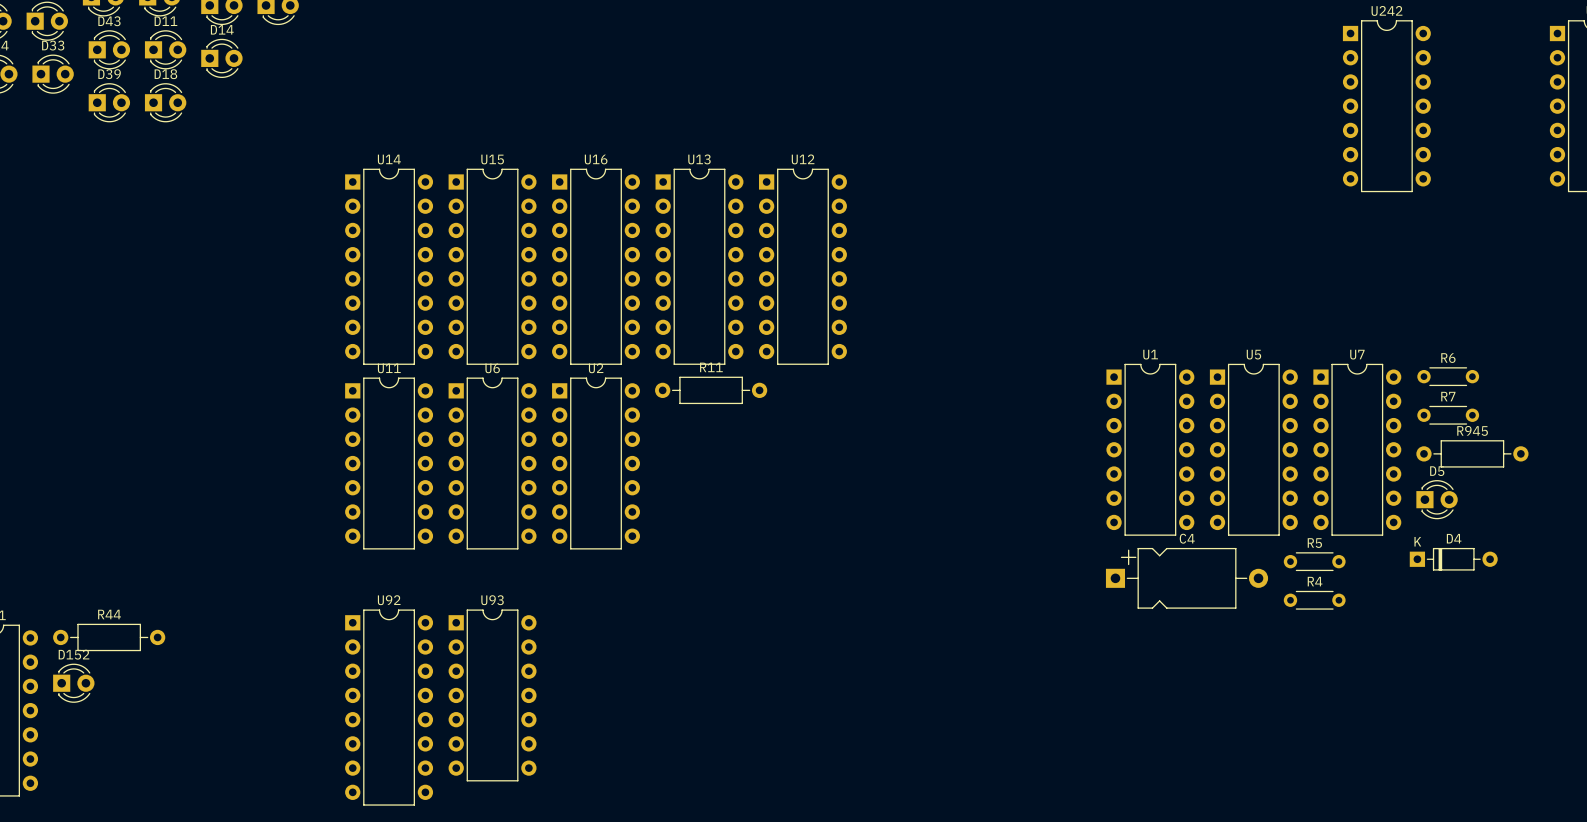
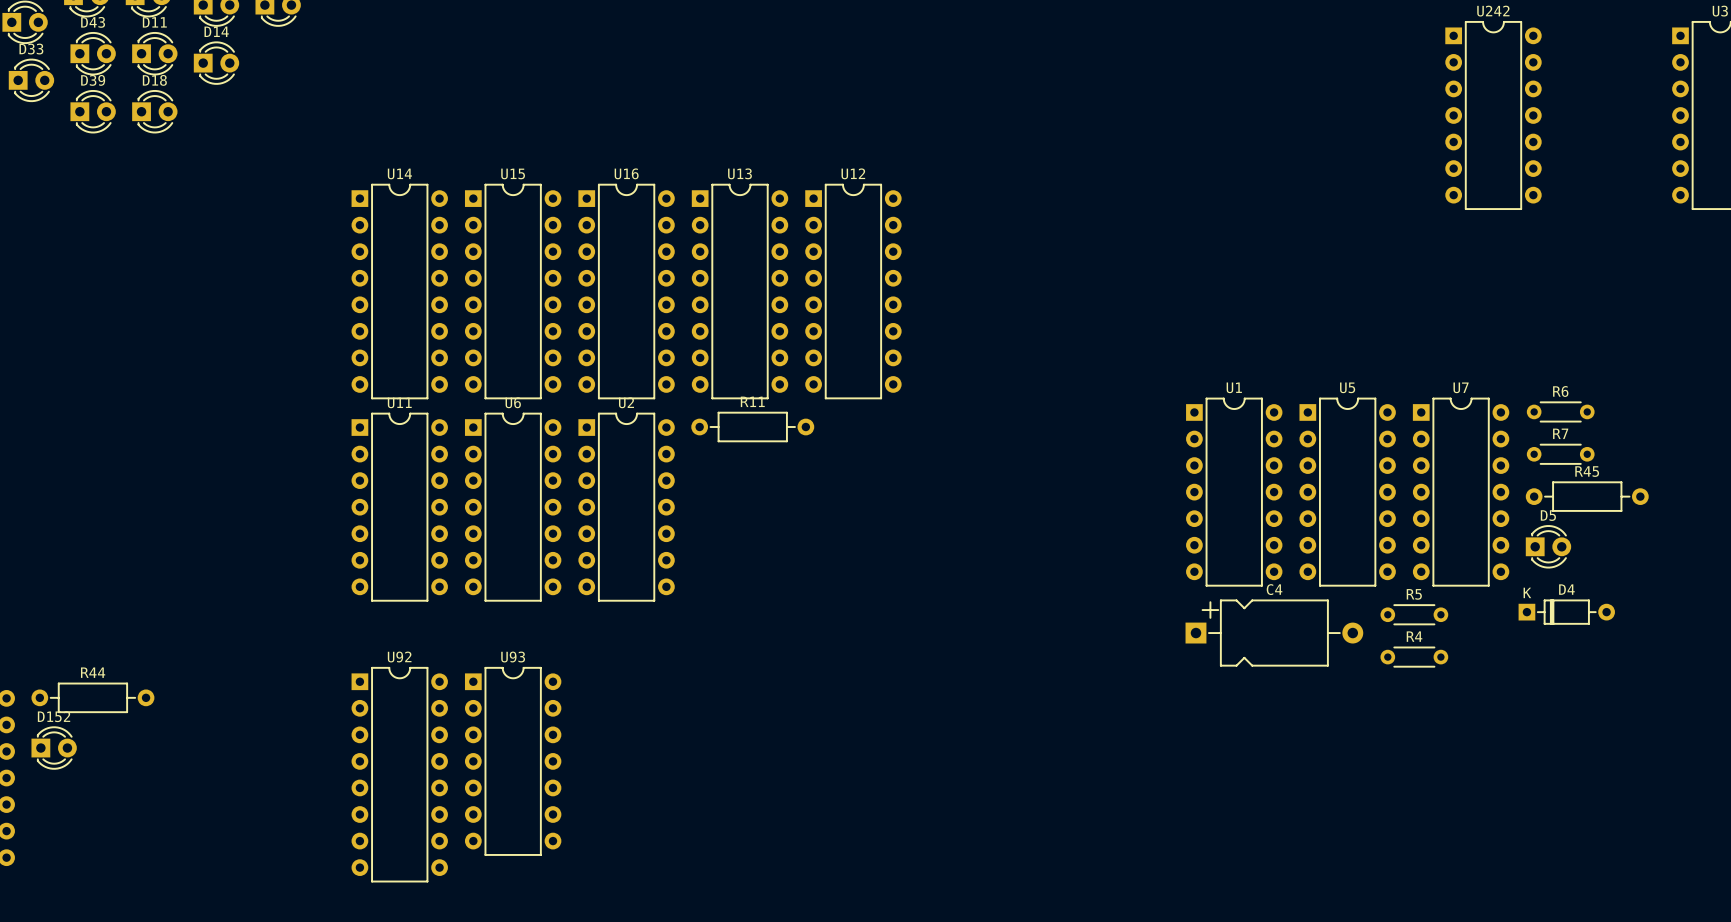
R945 name: R945 (1472, 430) -> R45 (1587, 471)

